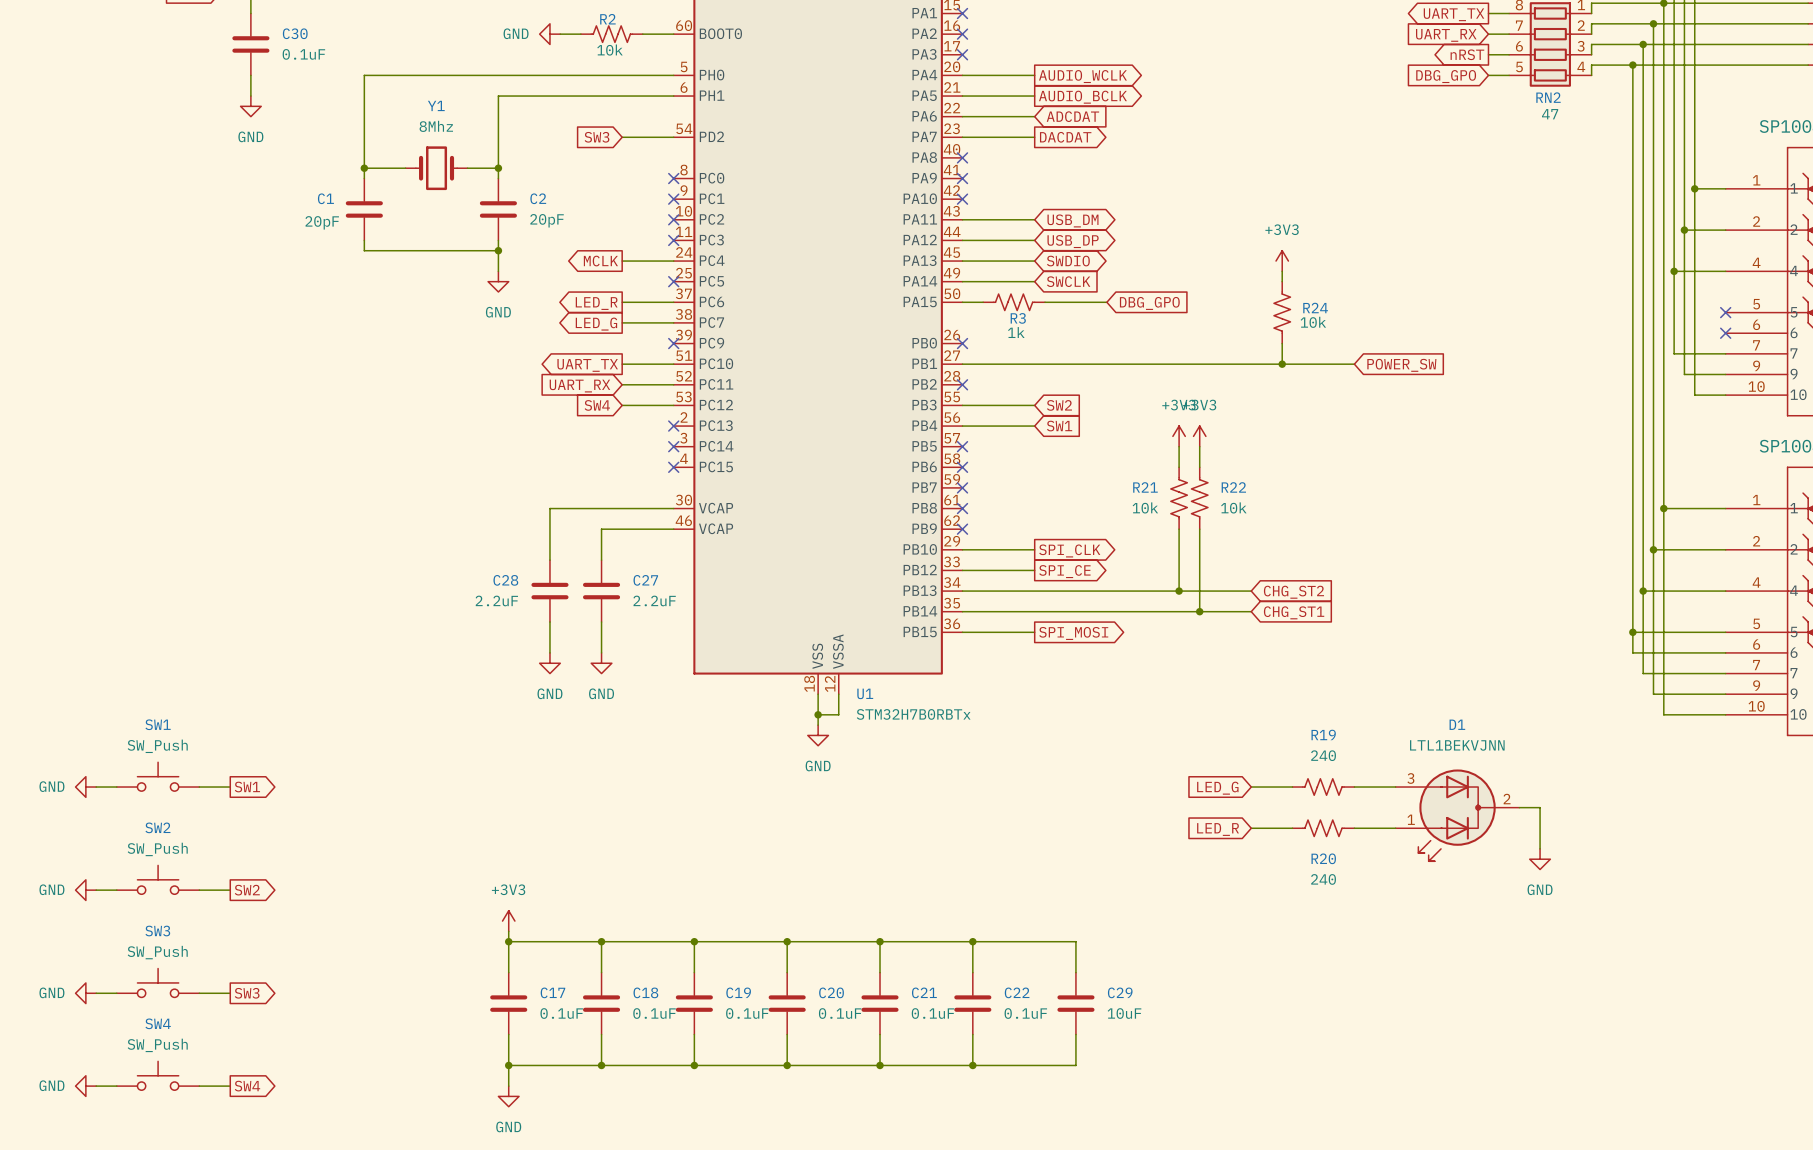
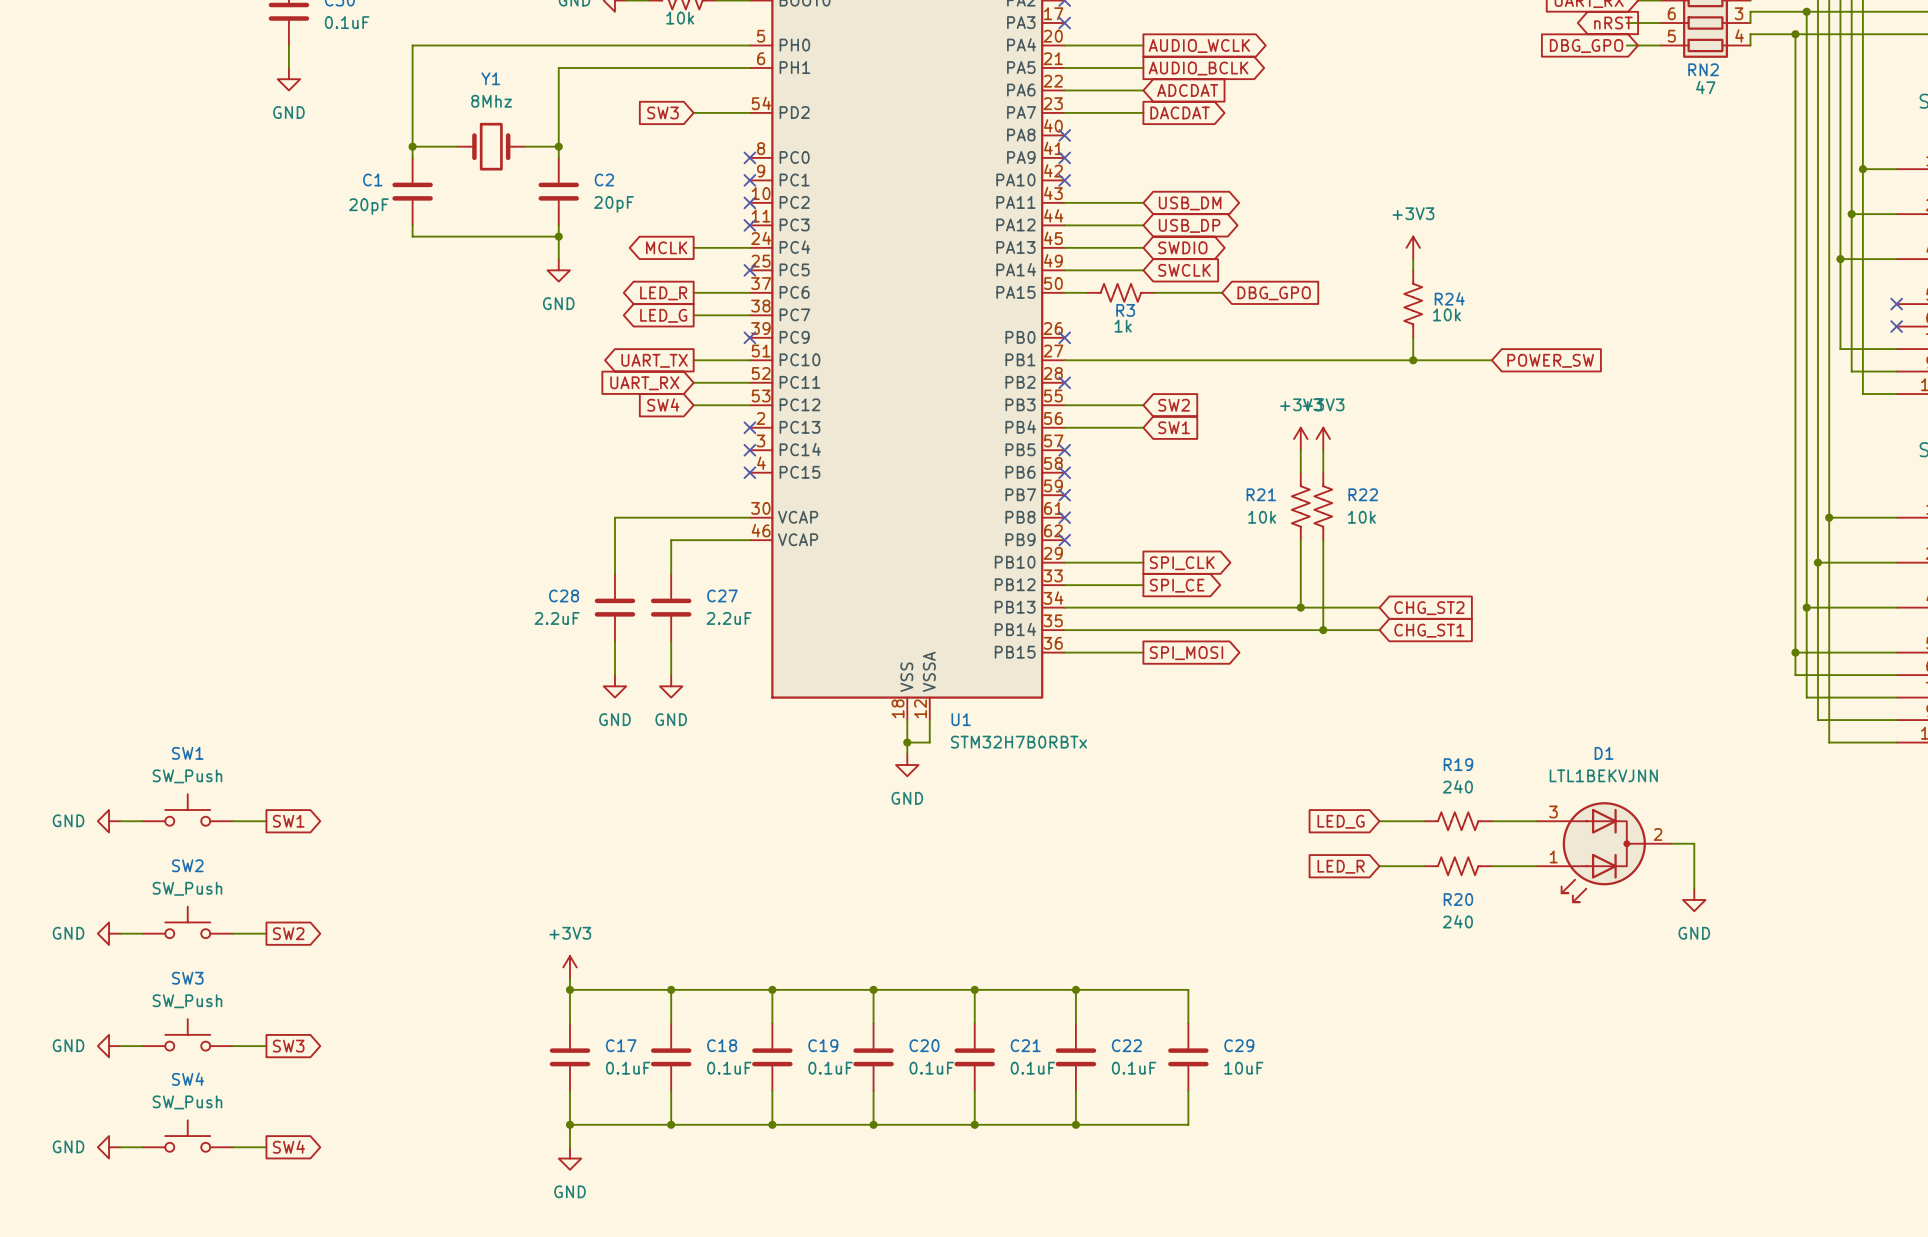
wire: none -> (1626, 23) (1638, 23)
wire: none -> (1626, 45) (1638, 45)

